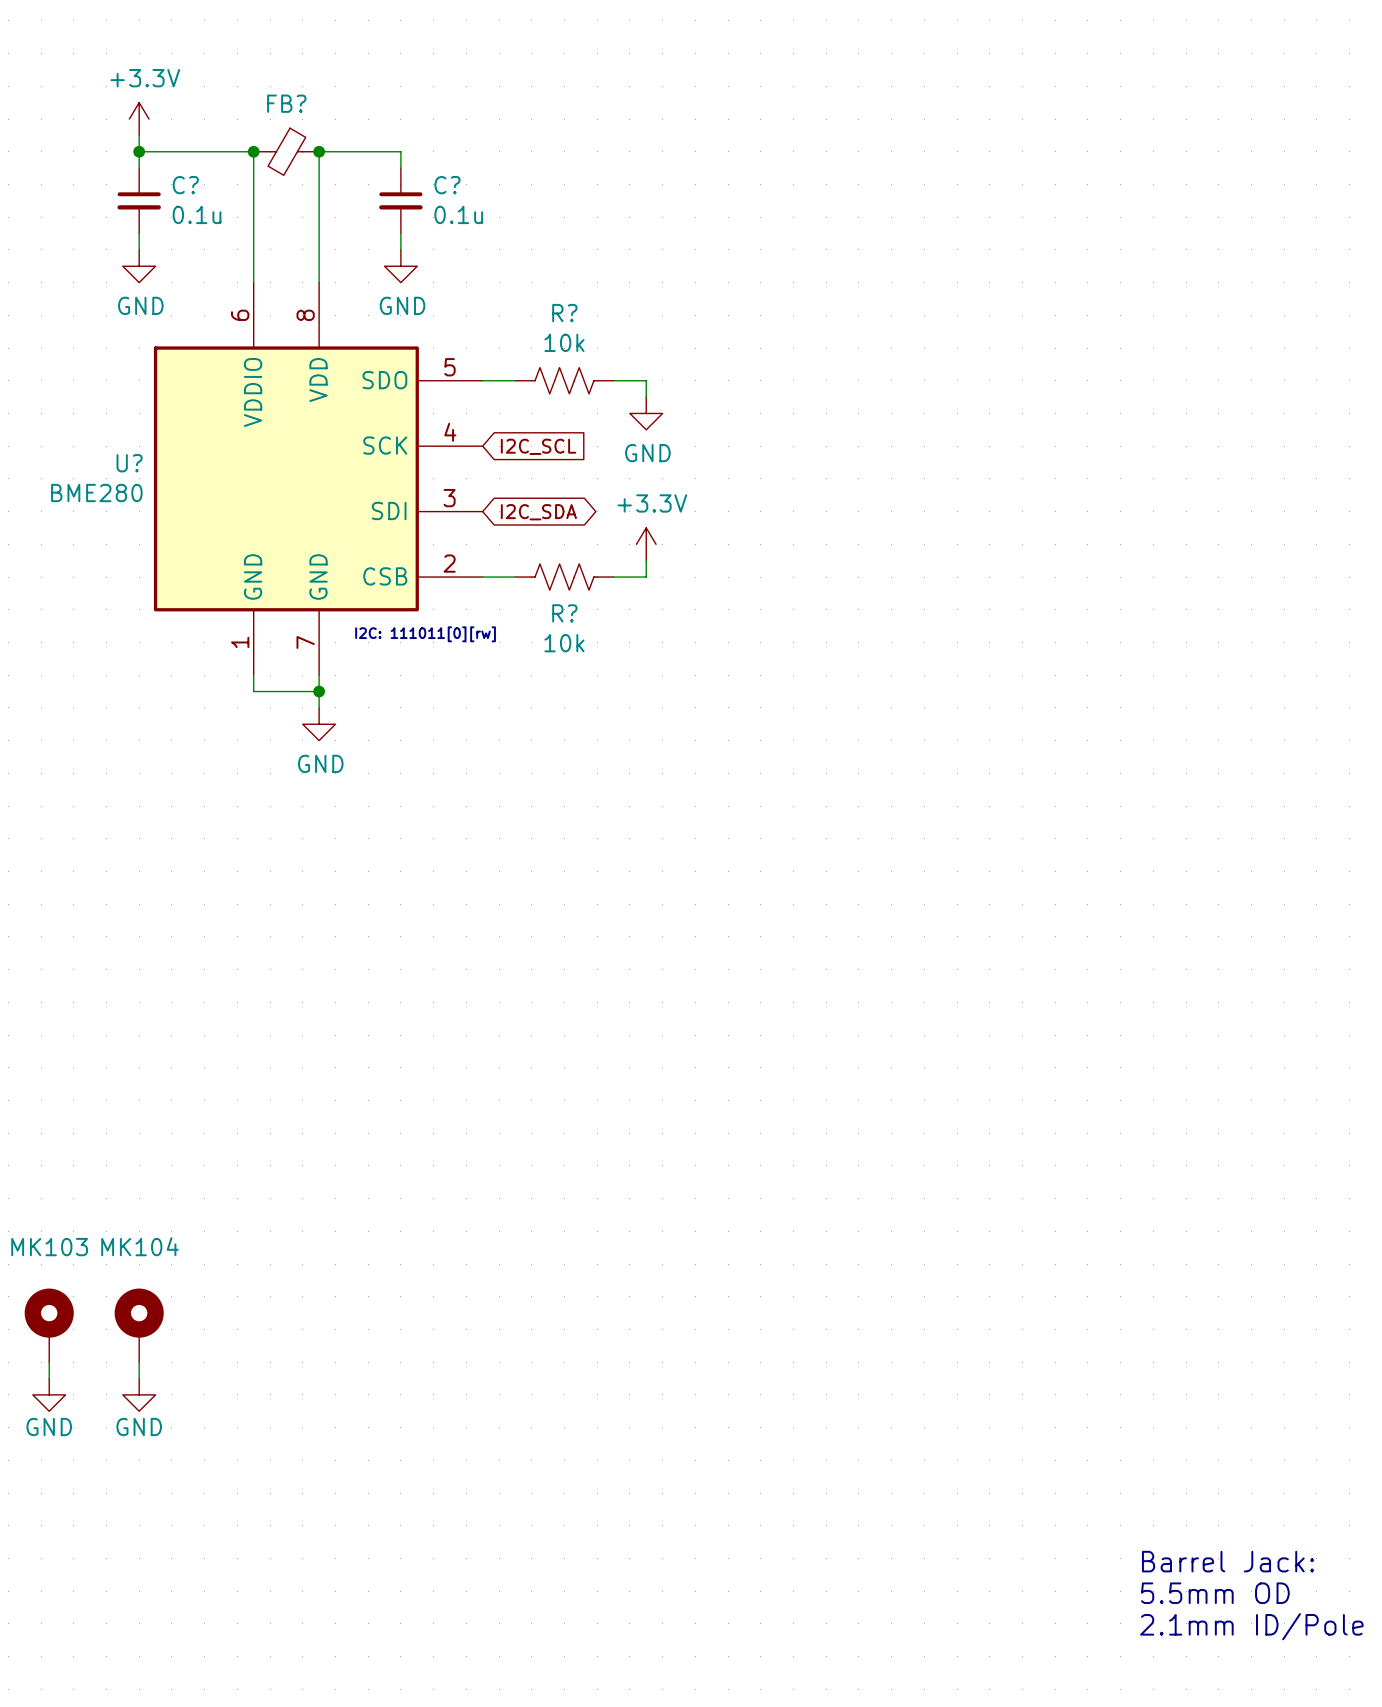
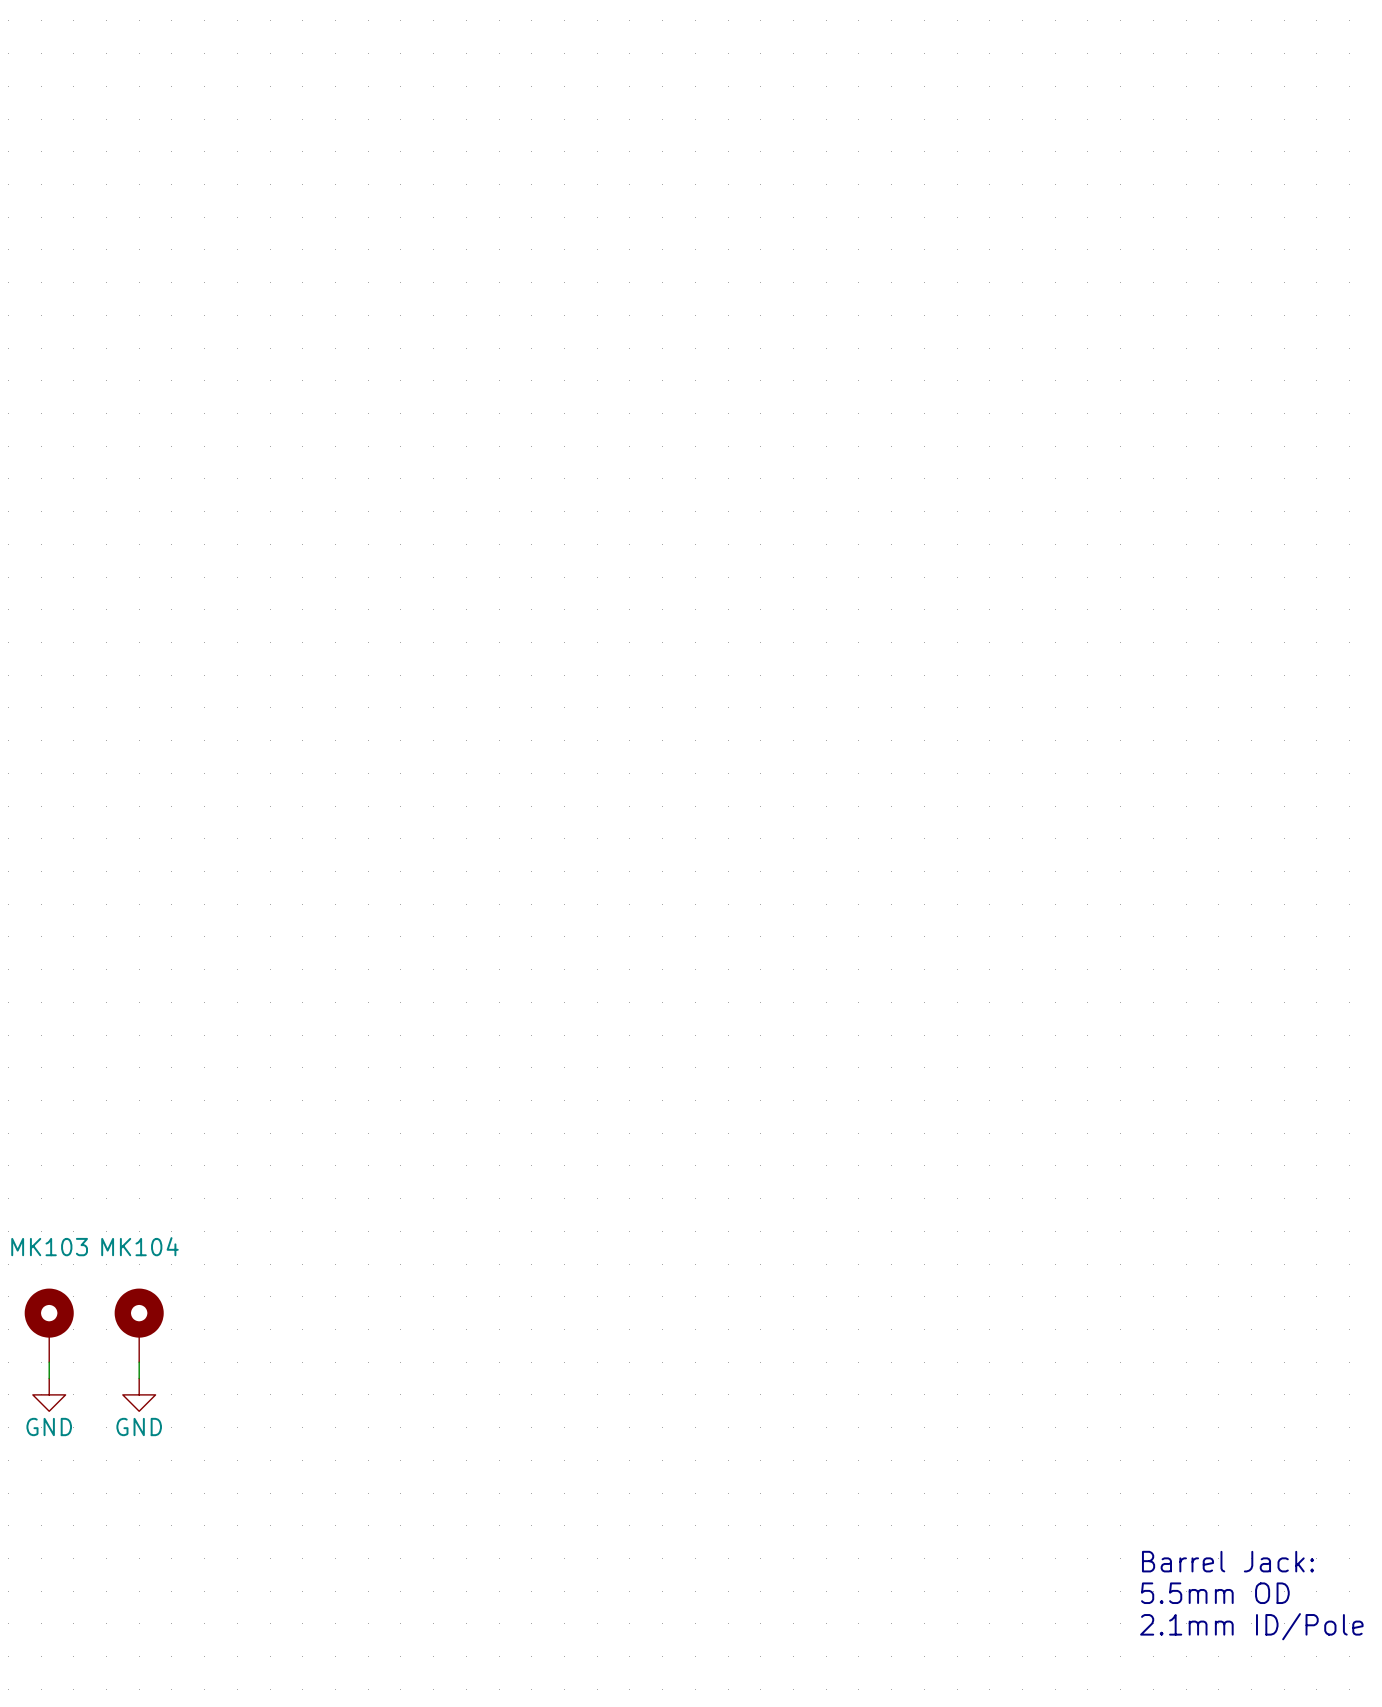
power symbol: +3.3V (139, 119) -> none
wire: (139, 135) (139, 168) -> none
wire: (139, 151) (253, 151) (253, 282) -> none
junction: (139, 151) -> none
junction: (253, 151) -> none
FB?: (286, 151) -> none
junction: (319, 151) -> none
wire: (400, 168) (400, 151) (319, 151) (319, 282) -> none
C?: 0.1u (139, 200) -> none
C?: 0.1u (400, 200) -> none
wire: (139, 233) (139, 249) -> none
wire: (400, 233) (400, 249) -> none
power symbol: GND (139, 266) -> none
power symbol: GND (400, 266) -> none
wire: (482, 380) (515, 380) -> none
R?: 10k (564, 380) -> none
wire: (613, 380) (646, 380) (646, 397) -> none
power symbol: GND (646, 413) -> none
global label: I2C_SCL (538, 446) -> none
U?: BME280 (318, 478) -> none
global label: I2C_SDA (538, 512) -> none
power symbol: +3.3V (646, 544) -> none
wire: (646, 560) (646, 577) (613, 577) -> none
wire: (482, 577) (515, 577) -> none
R?: 10k (564, 577) -> none
text: I2C: 111011[0][rw] (425, 634) -> none
wire: (253, 675) (253, 691) (319, 691) -> none
wire: (319, 675) (319, 707) -> none
junction: (319, 691) -> none
power symbol: GND (319, 724) -> none

